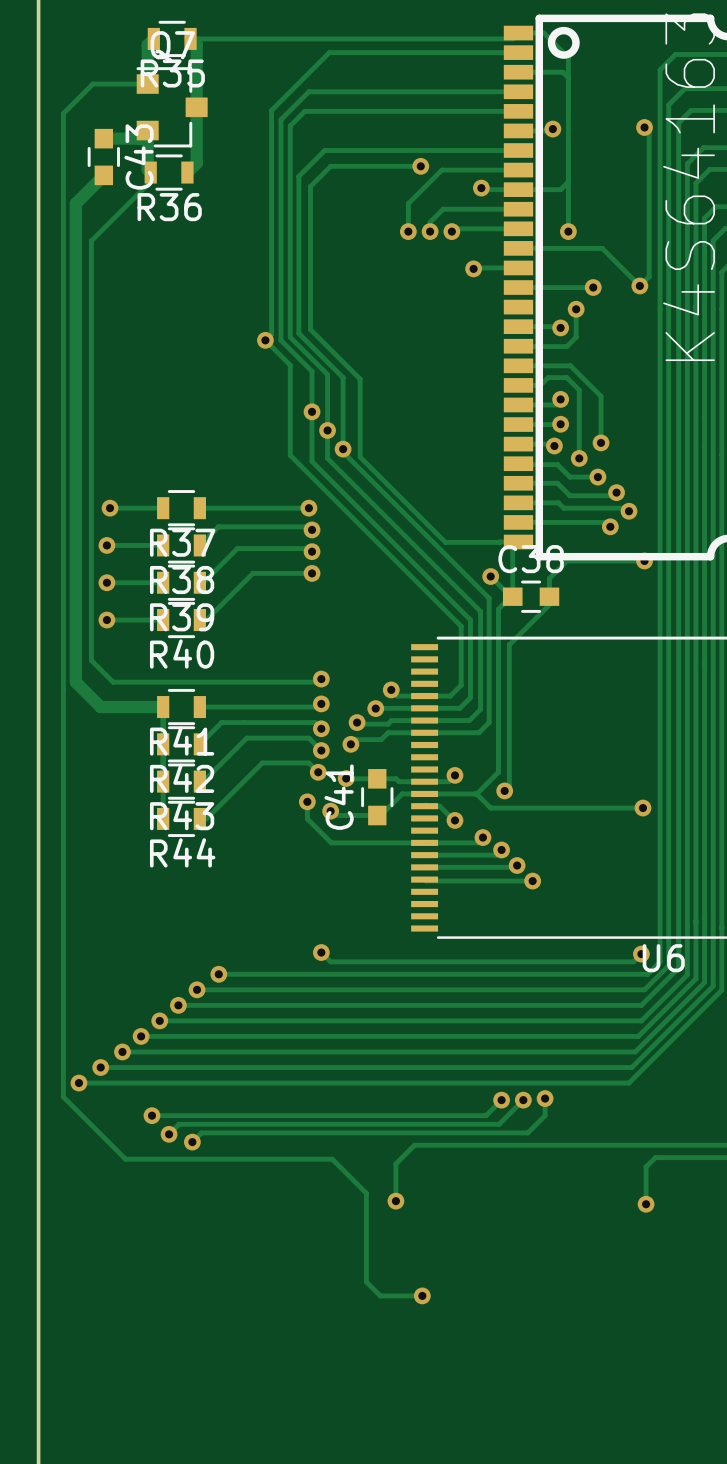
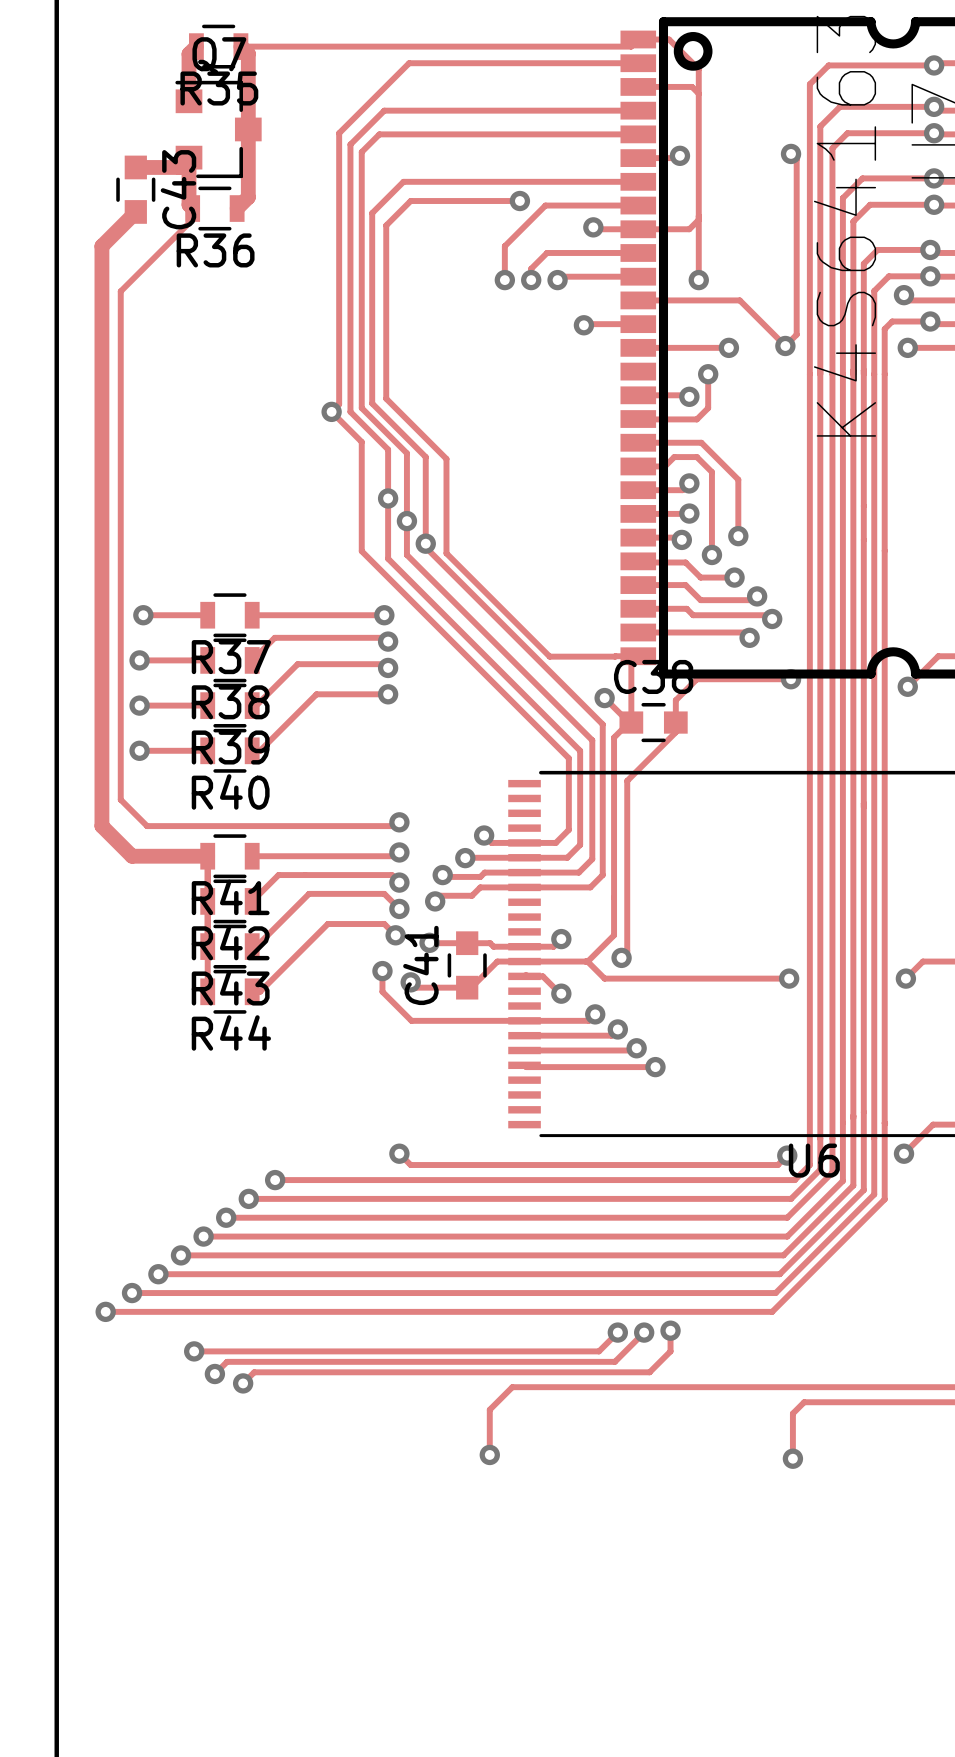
track: (147, 84) (92, 84) (63, 113) (63, 1097) (125, 1159) (332, 1159) (366, 1193) (366, 1281) (380, 1295) (422, 1295) -> none
via: (422, 1295) -> none

